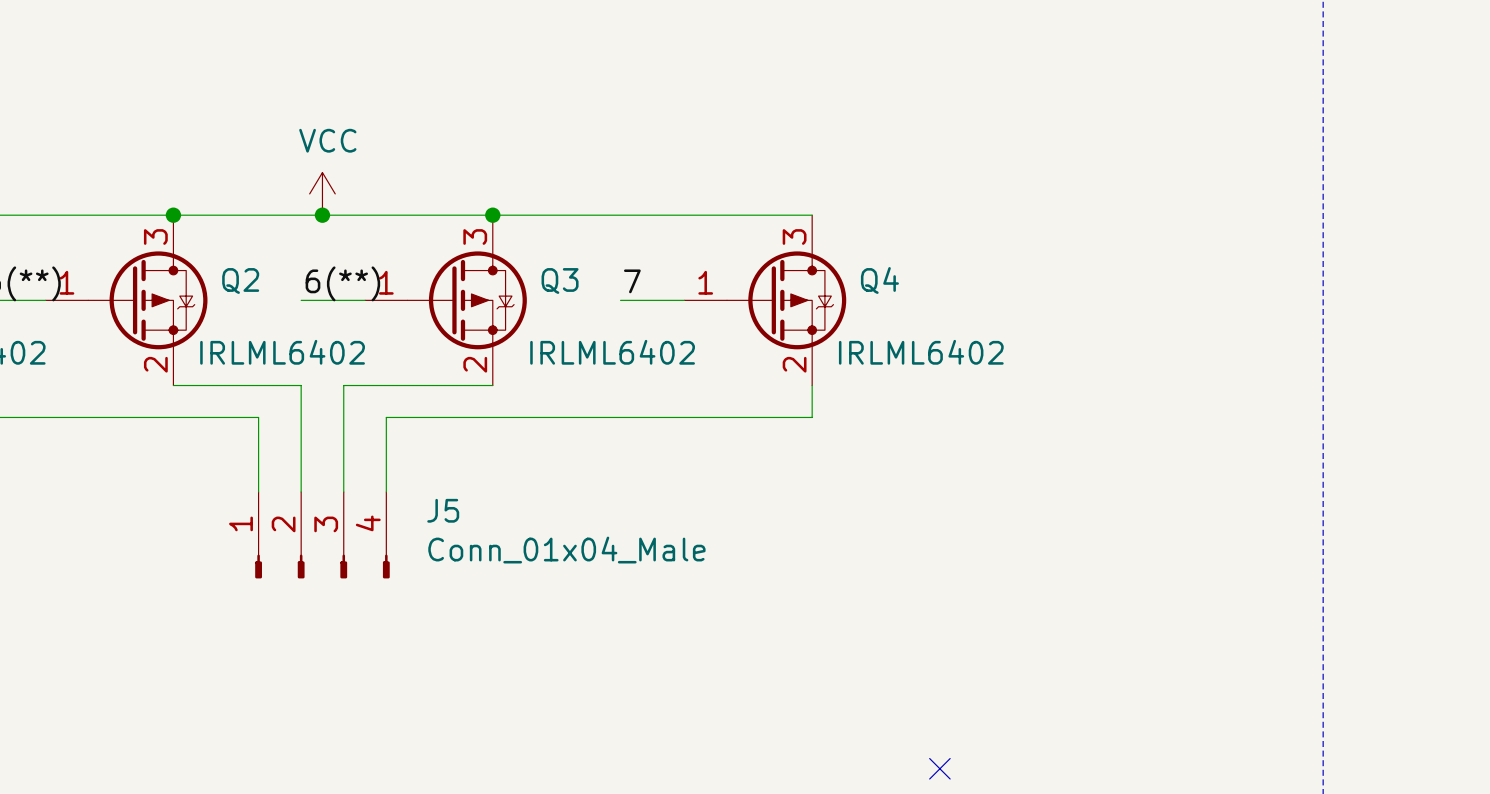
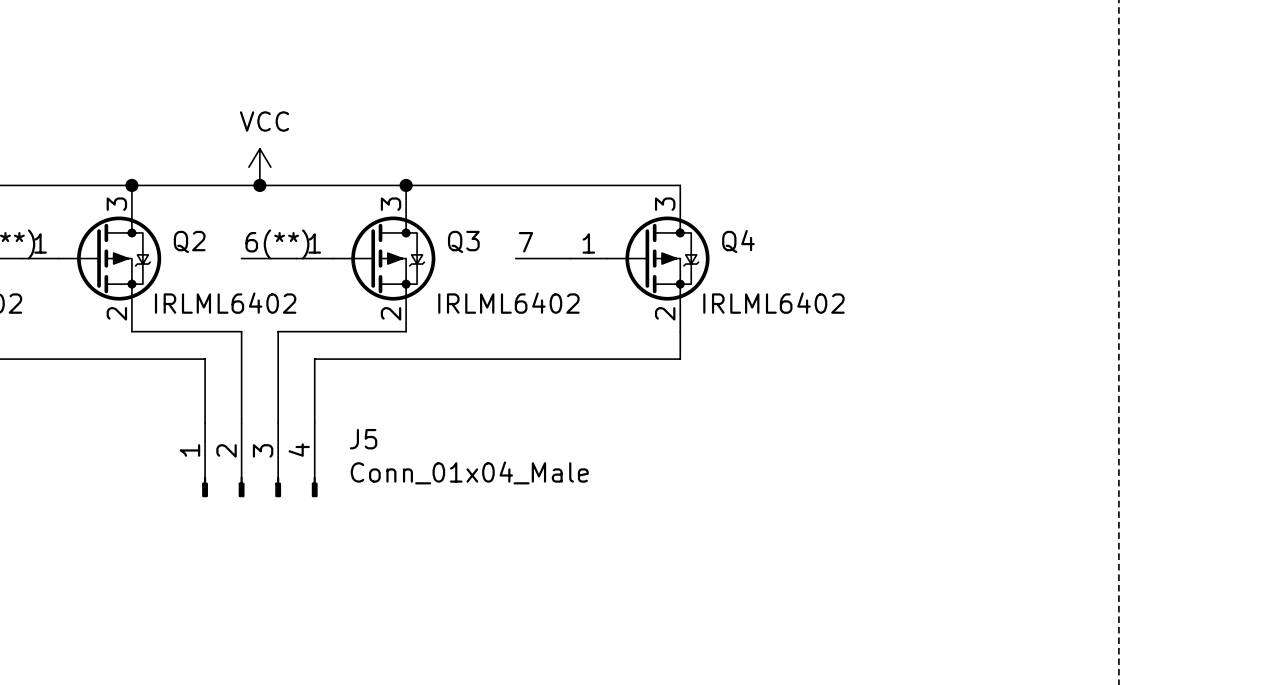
no-connect mark: (939, 768) -> none

